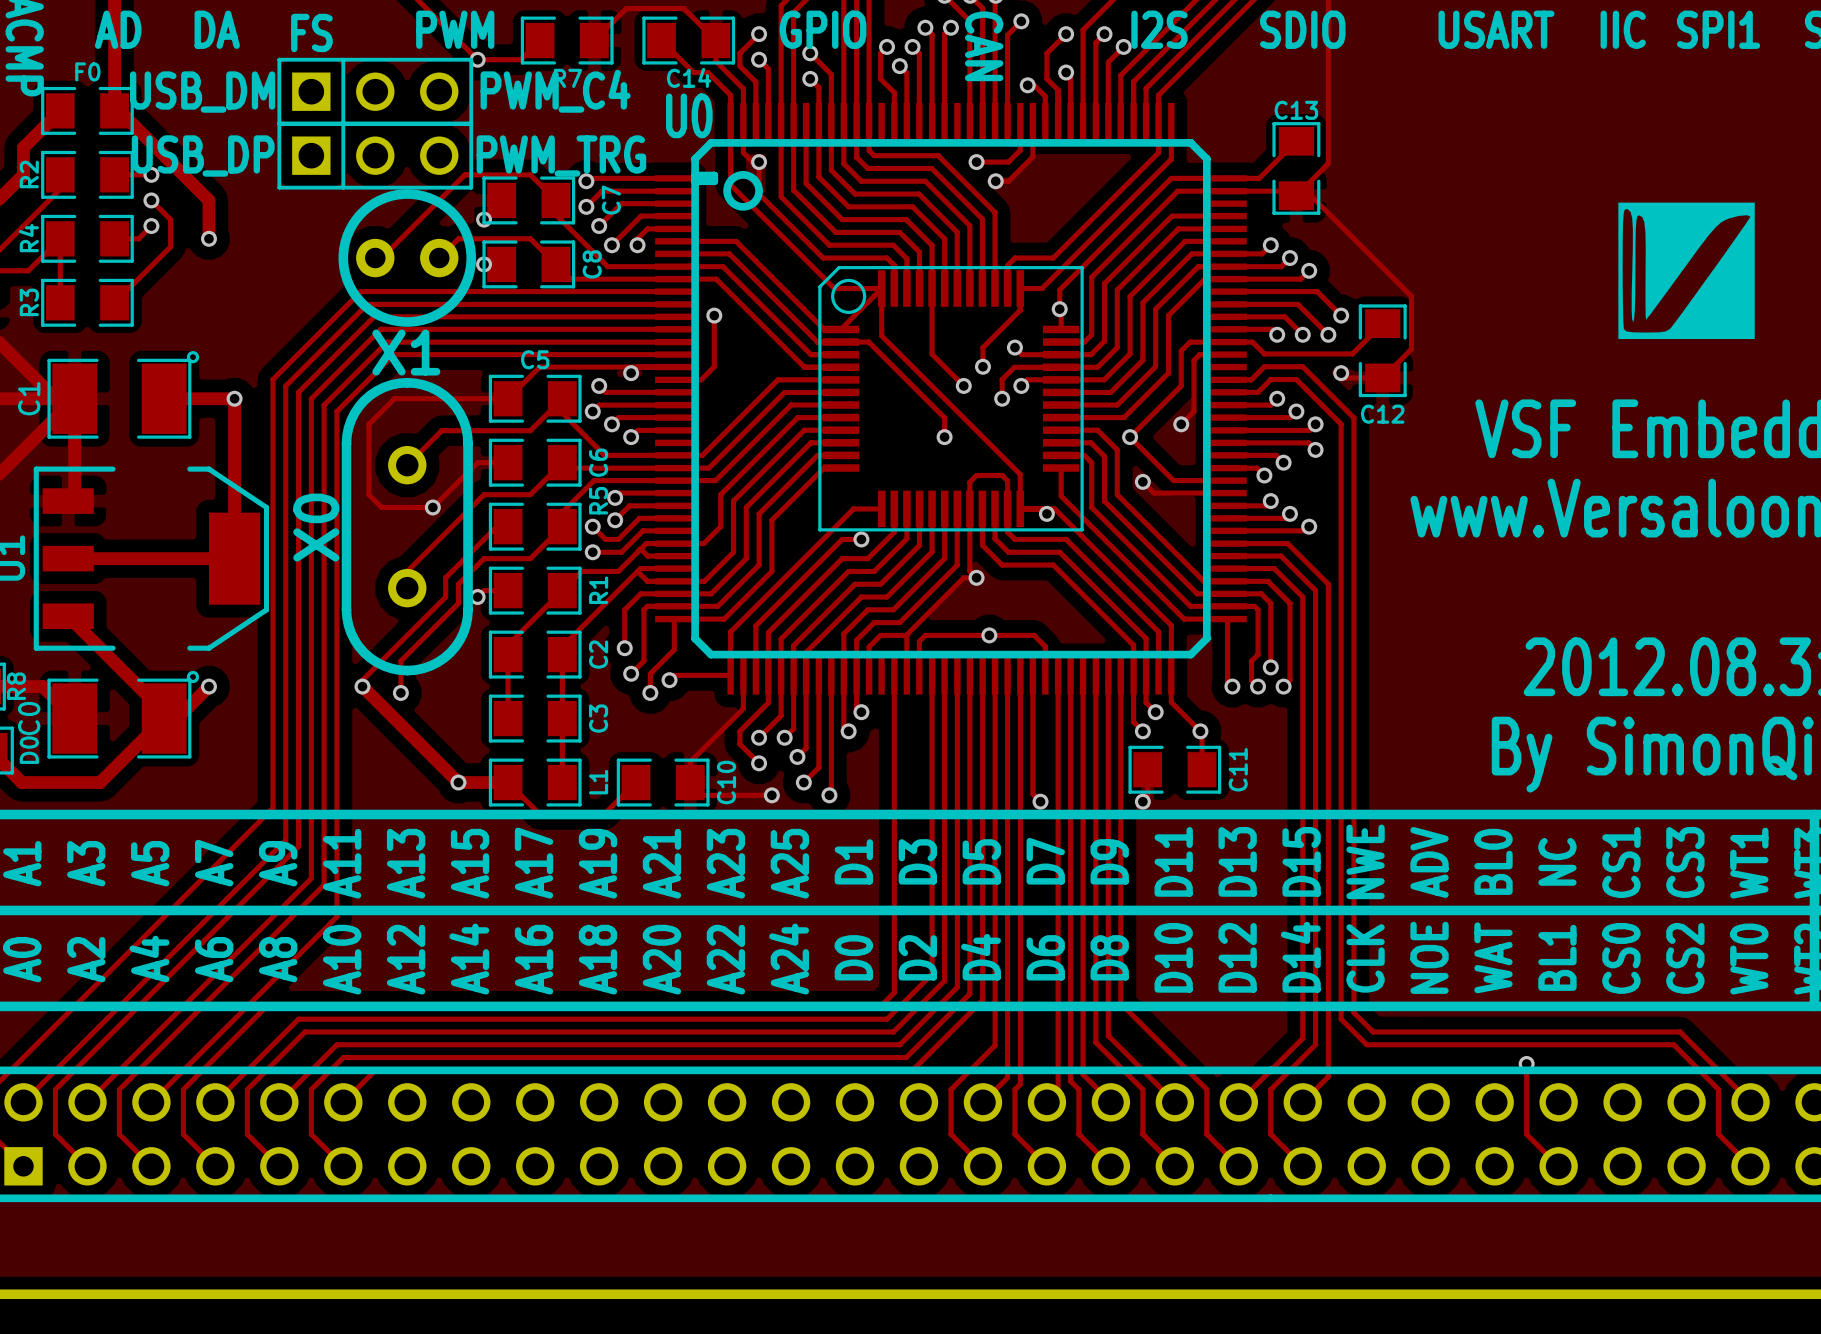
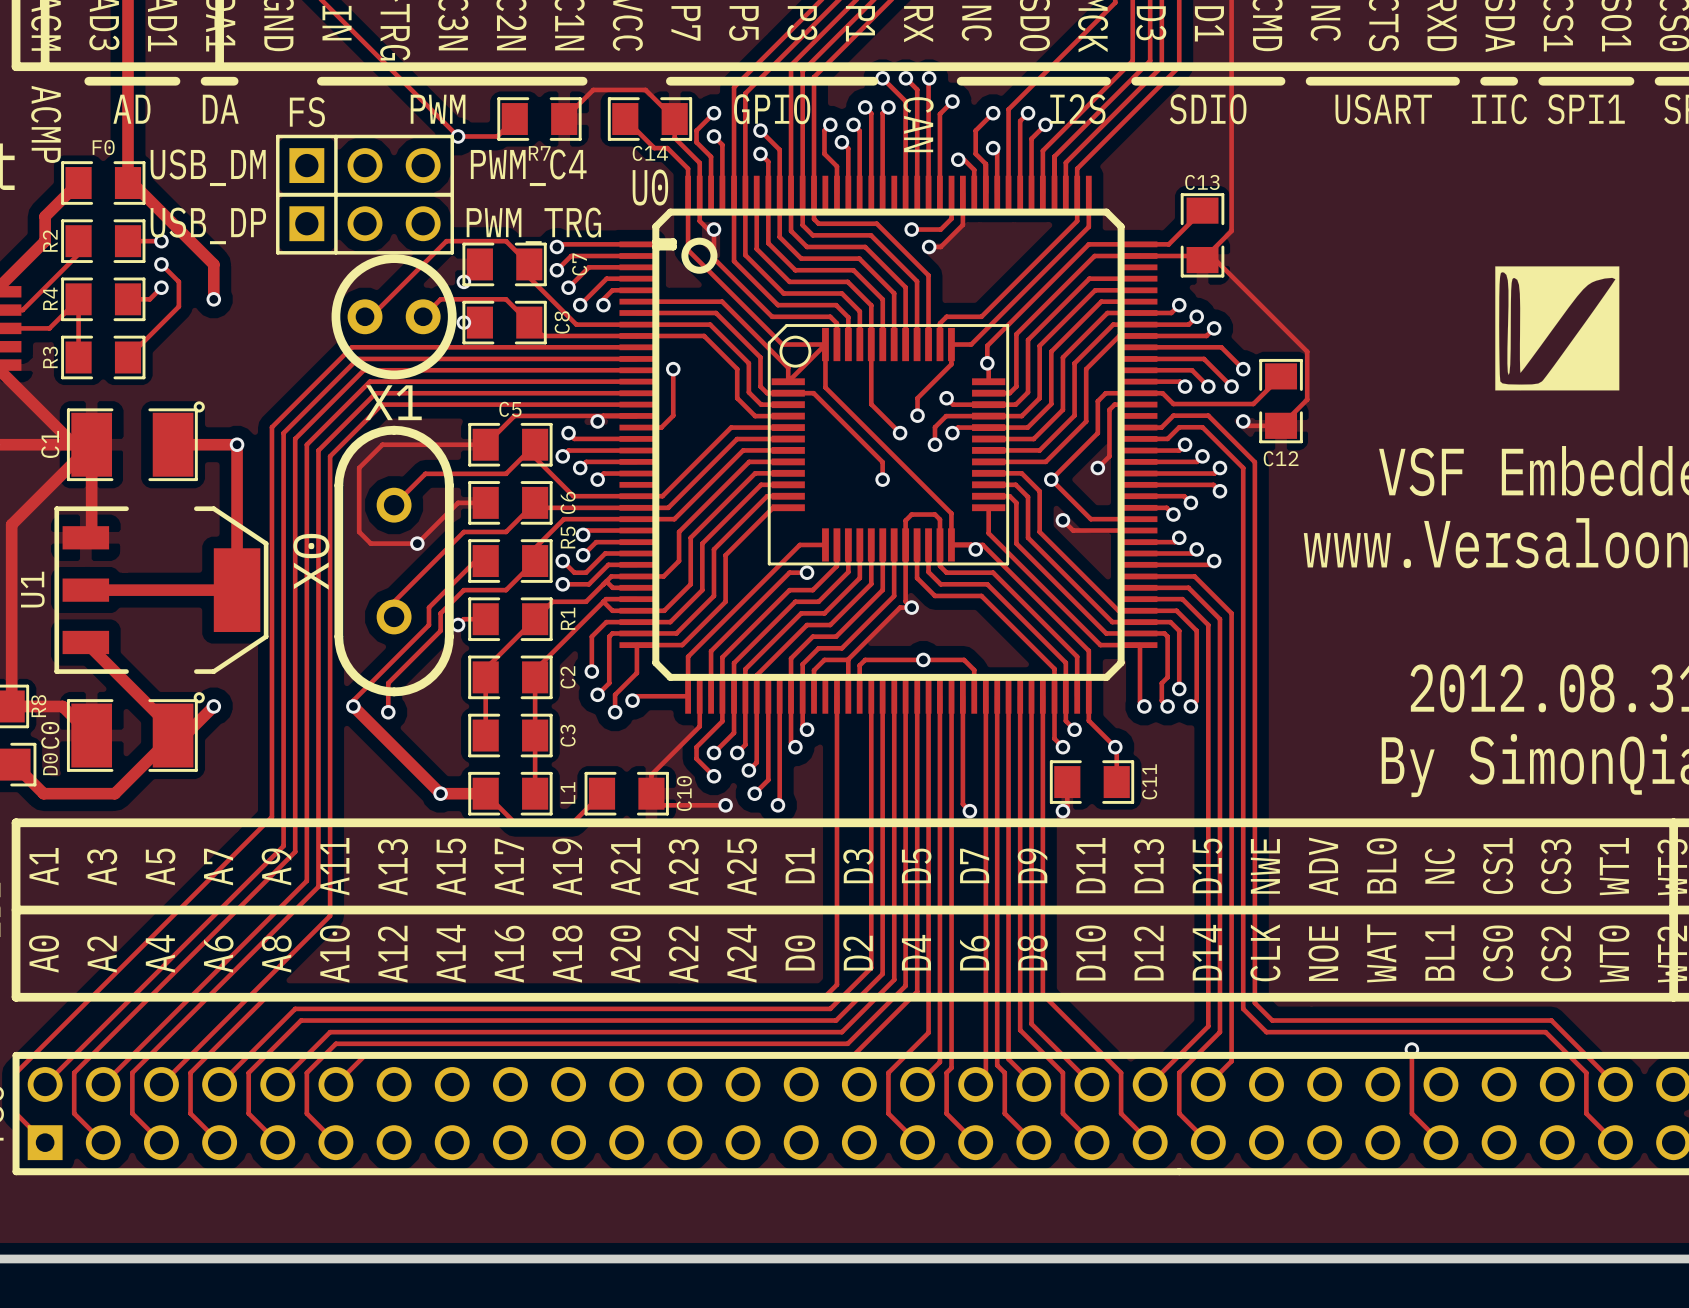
track: (736, 241) (824, 329) (840, 329) -> (693, 301) (722, 301) (788, 367) (788, 381)
track: (729, 253) (810, 334) -> (686, 313) (716, 313) (760, 357) (760, 386)
track: (722, 266) (797, 341) -> (681, 324) (710, 324) (748, 363) (748, 392)
track: (716, 279) (784, 347) -> (675, 335) (704, 335) (737, 369) (737, 398)

